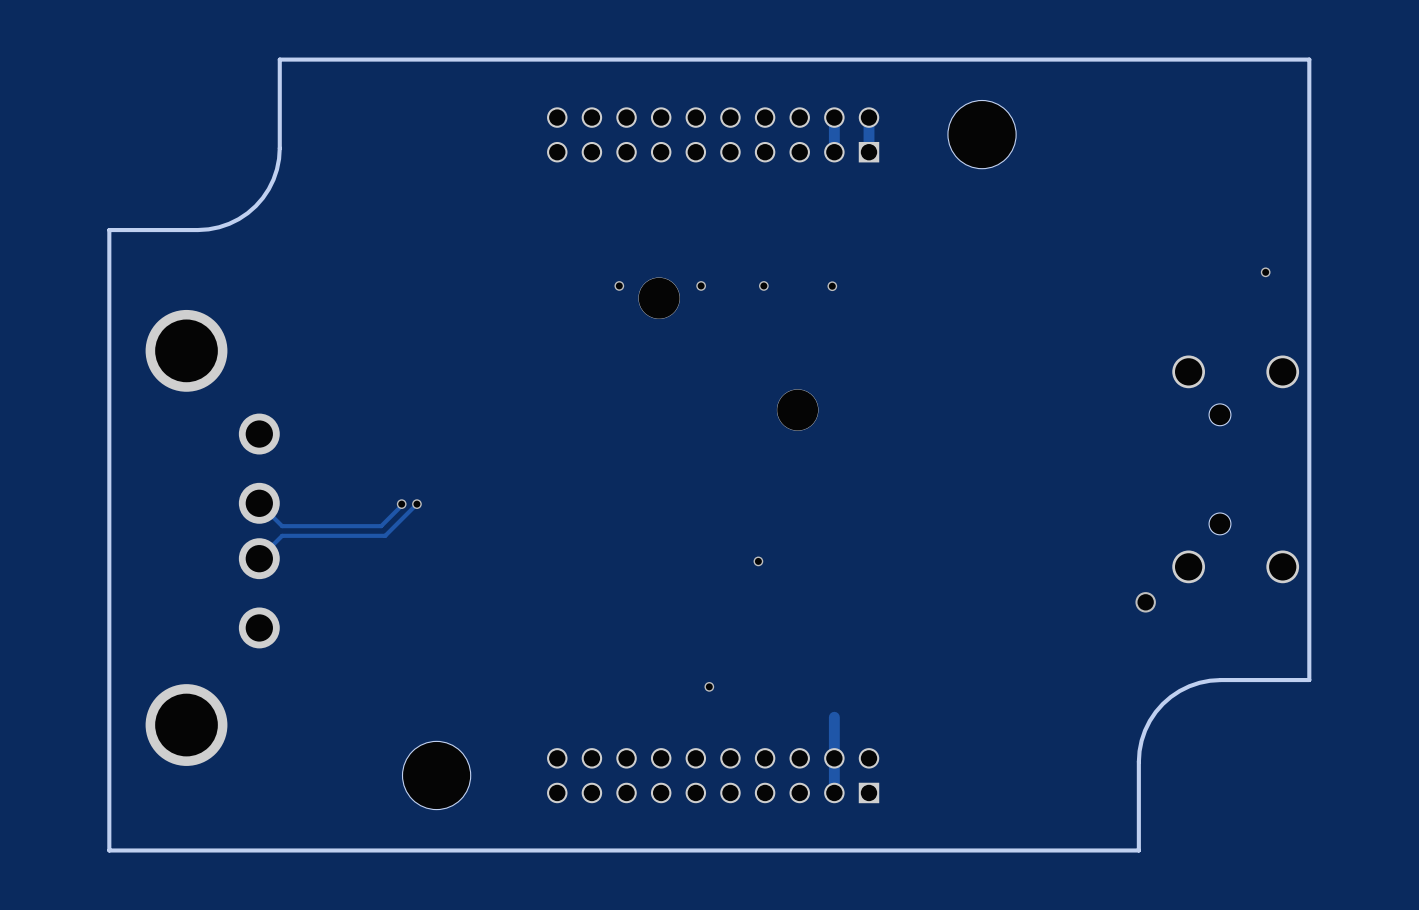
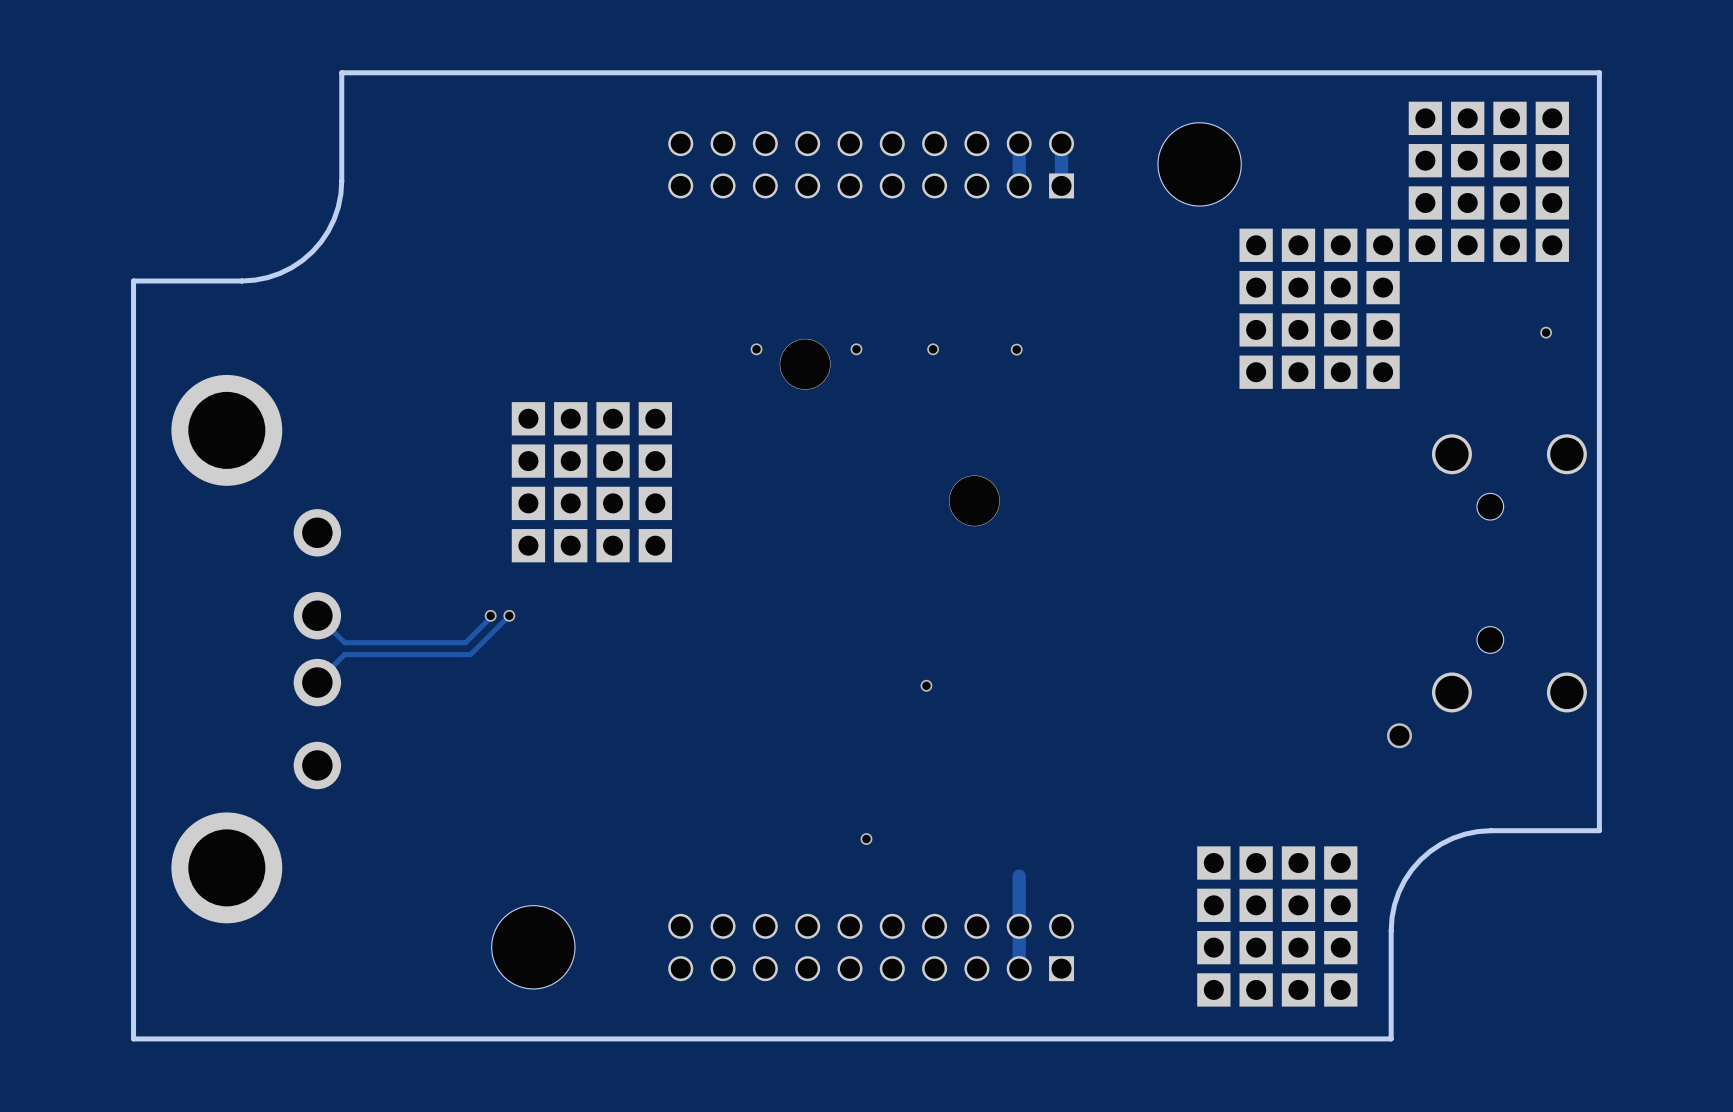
part: none -> (1488, 181)
part: none -> (1319, 308)
part footprint: [145, 309, 280, 766] -> [171, 374, 342, 924]
part: none -> (591, 482)
part: none -> (1277, 926)

